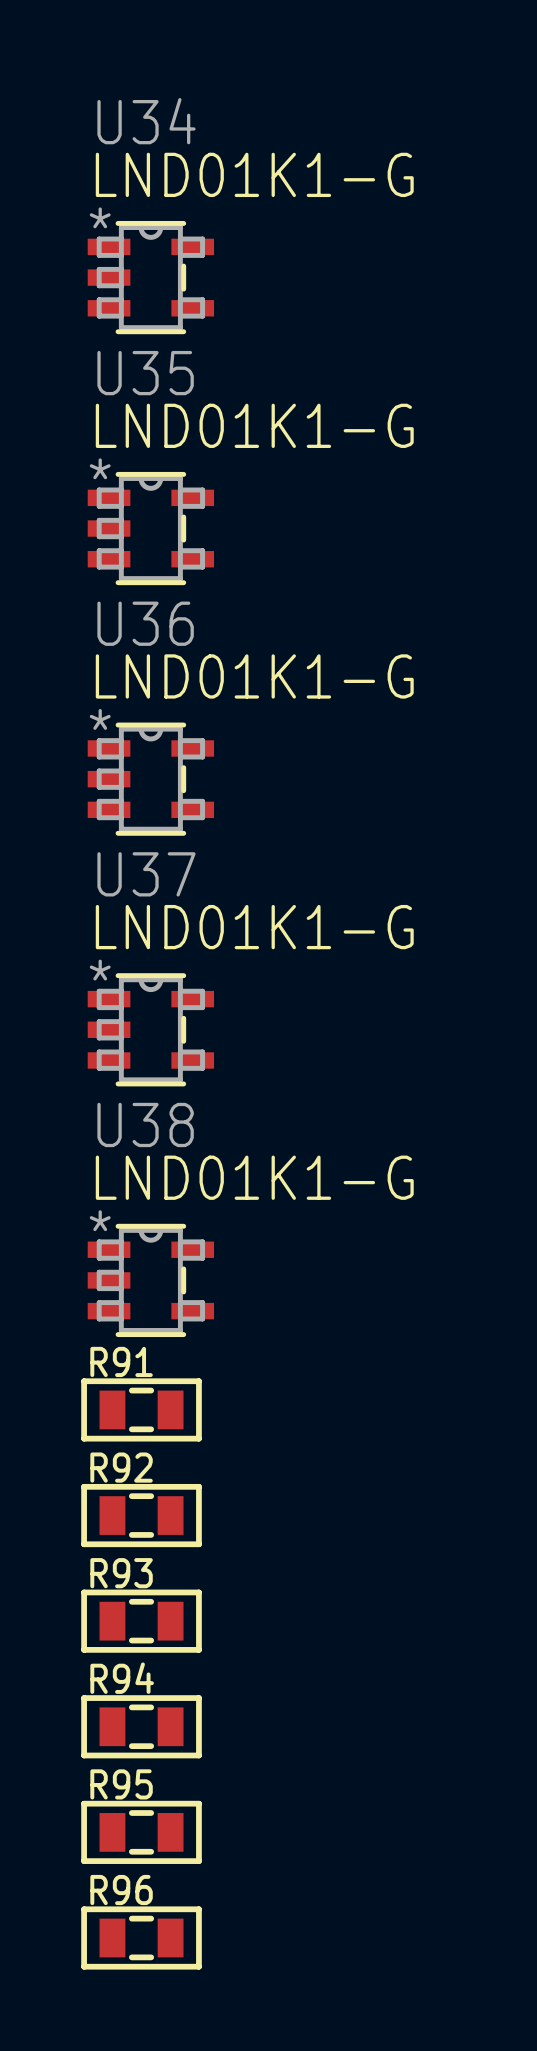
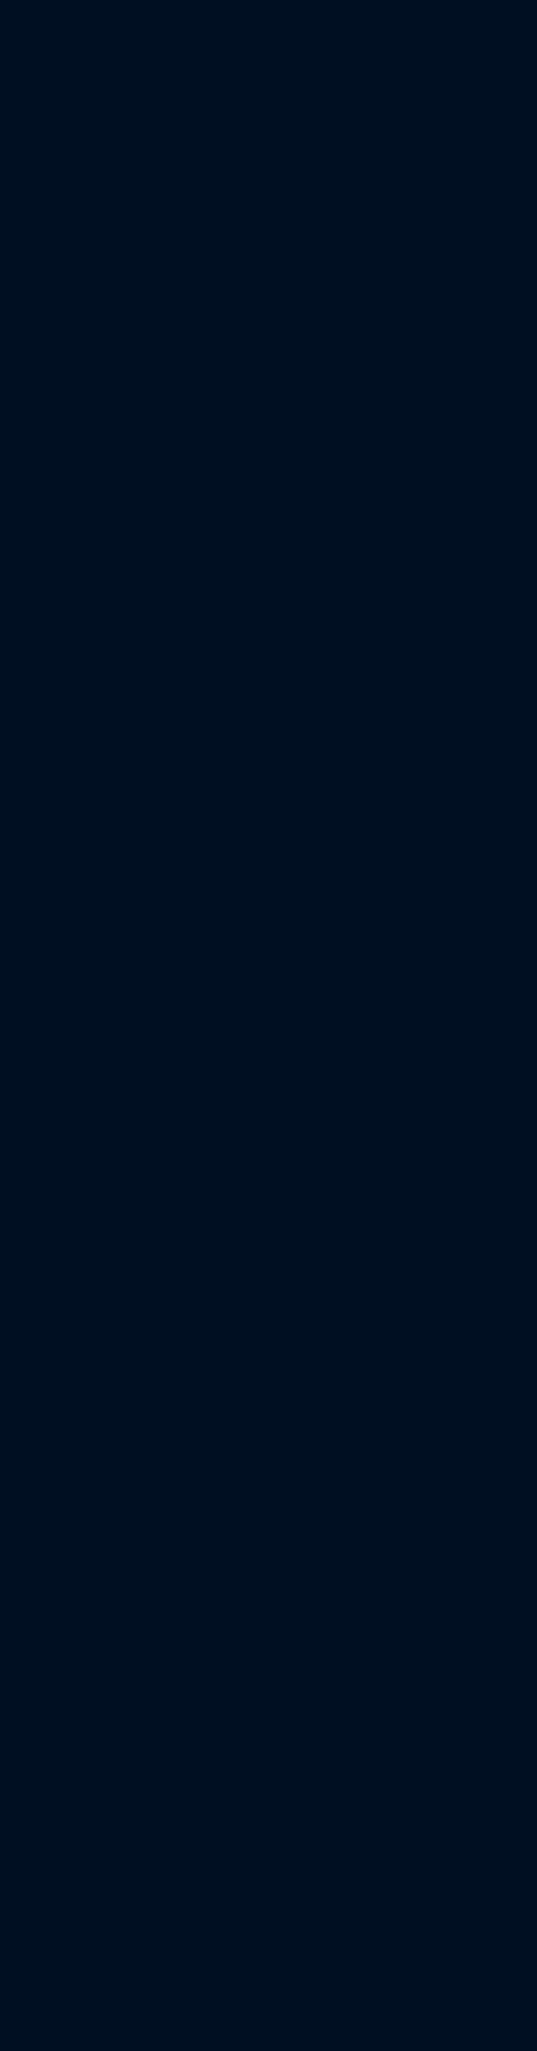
U34: LND01K1-G (150, 277) -> none
U35: LND01K1-G (150, 528) -> none
U36: LND01K1-G (150, 779) -> none
U37: LND01K1-G (150, 1029) -> none
U38: LND01K1-G (150, 1280) -> none
R91: (141, 1409) -> none
R92: (141, 1515) -> none
R93: (141, 1621) -> none
R94: (141, 1726) -> none
R95: (141, 1832) -> none
R96: (141, 1938) -> none

